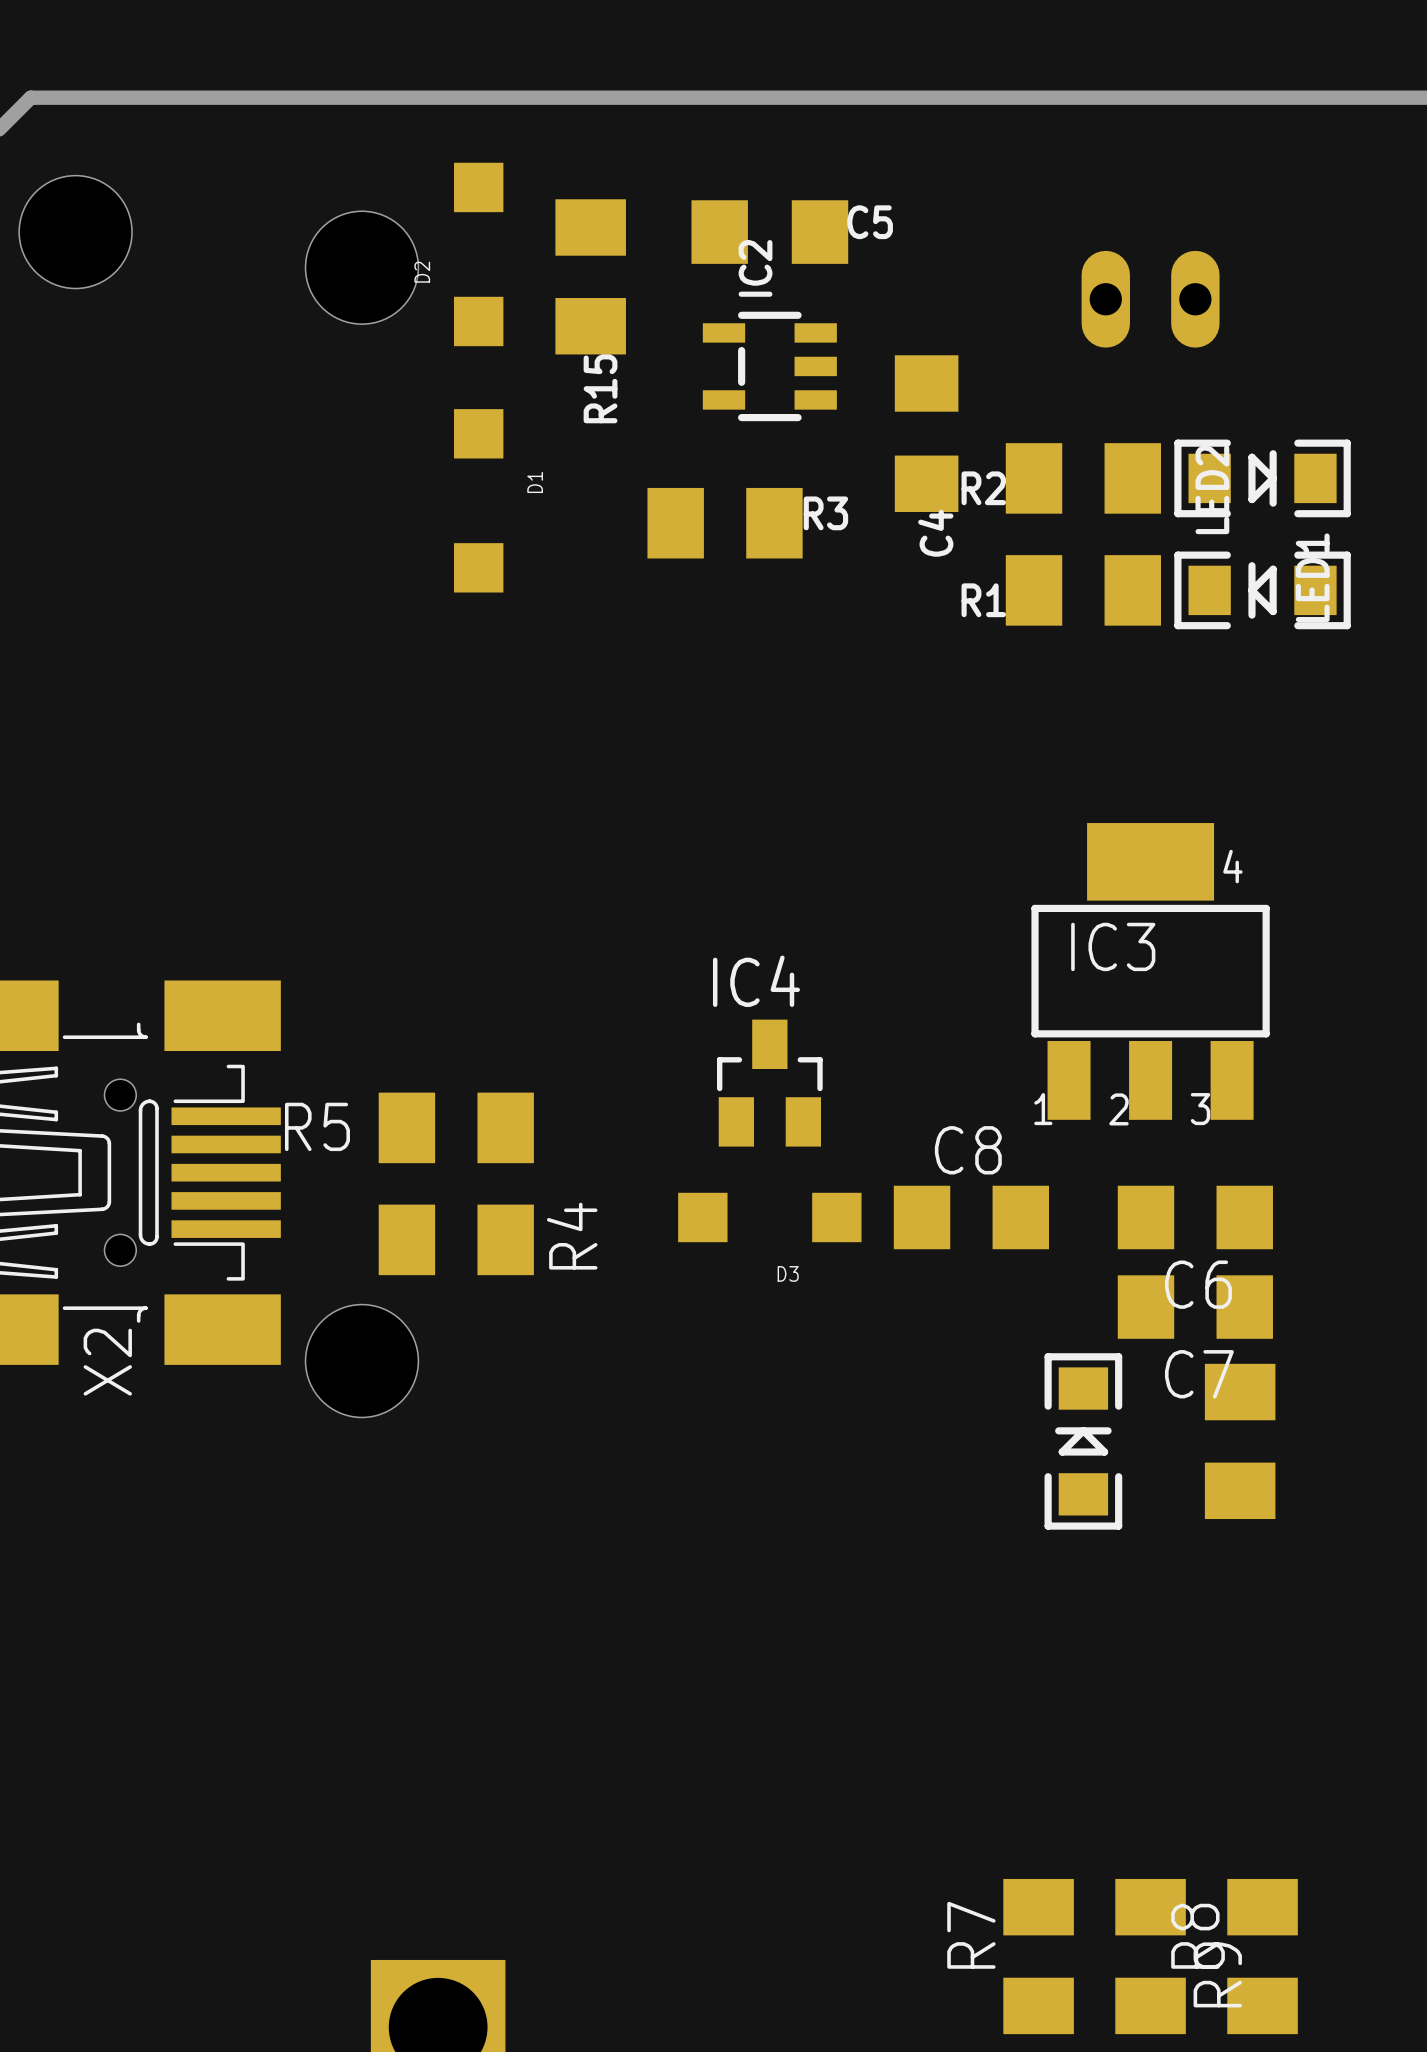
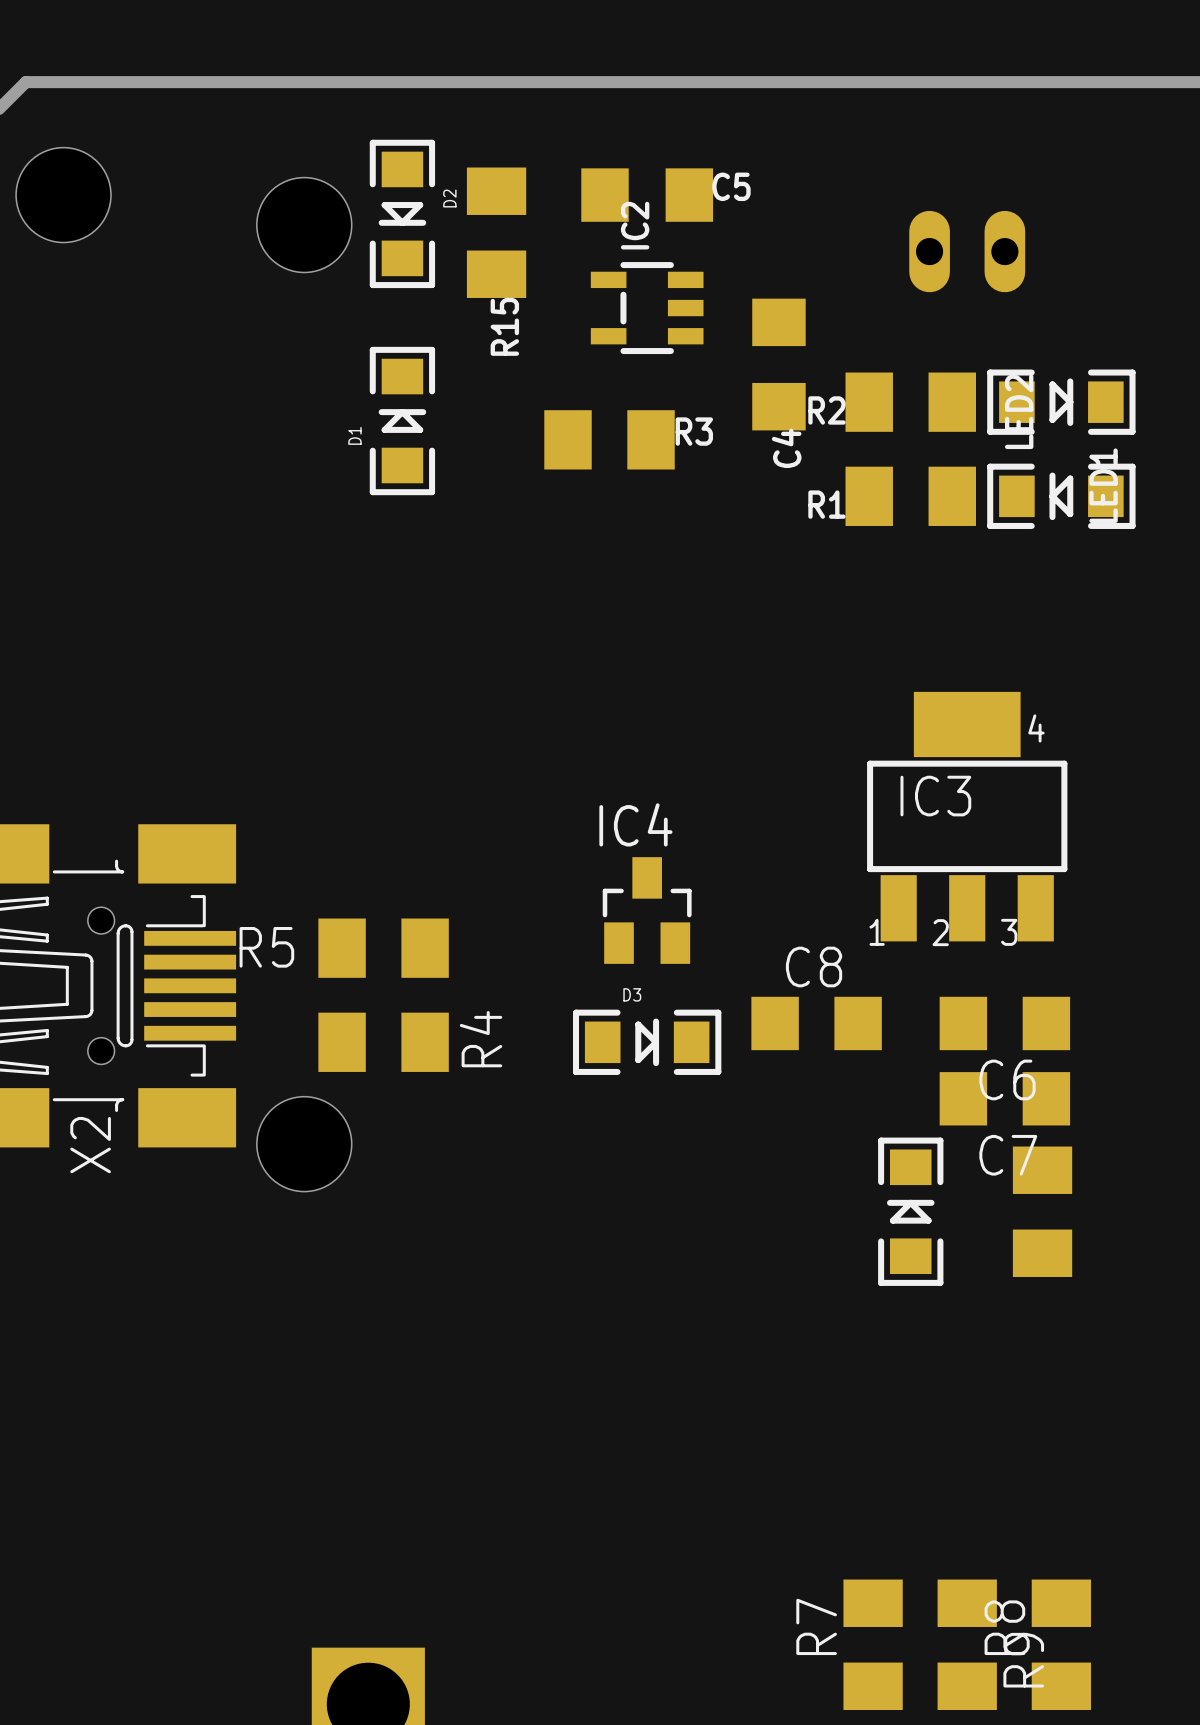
D2 footprint: [454, 162, 504, 347] -> [369, 139, 436, 289]
D2 name position: D2 (422, 272) -> D2 (449, 198)
D1 footprint: [454, 409, 504, 593] -> [369, 346, 436, 496]
D1 name position: D1 (535, 482) -> D1 (354, 435)
D3 footprint: [678, 1192, 862, 1243] -> [573, 1009, 722, 1075]
D3 name position: D3 (788, 1273) -> D3 (632, 994)

